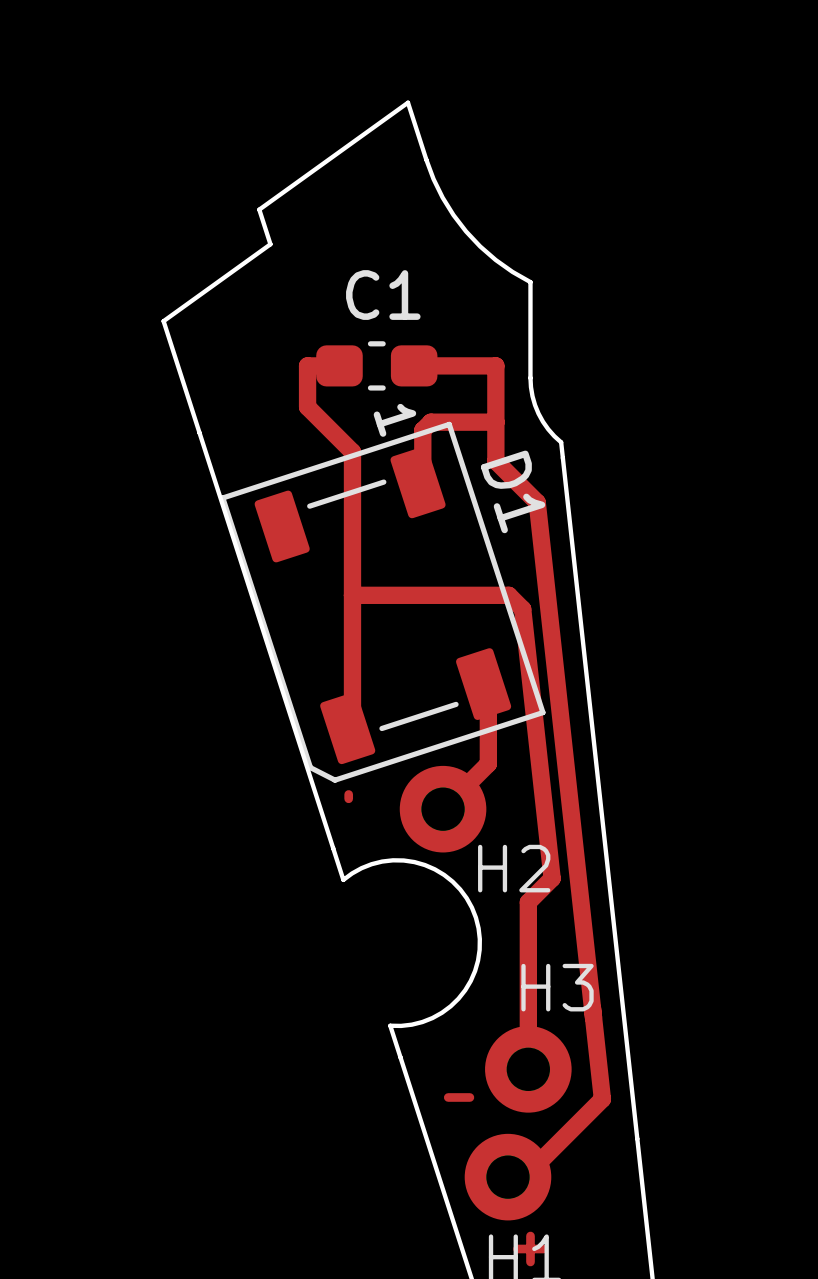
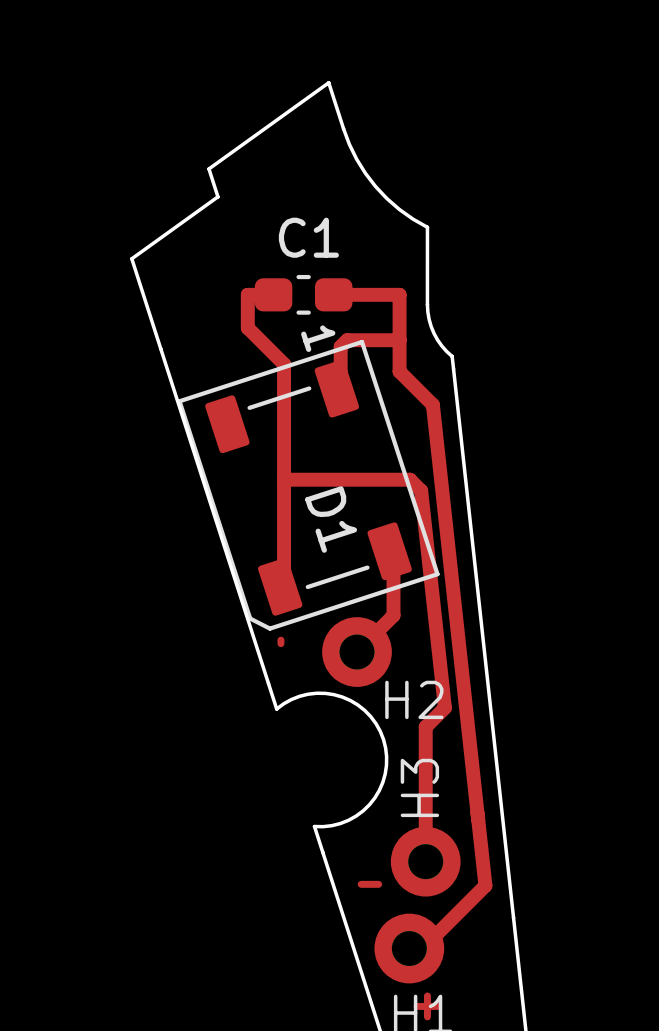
D1 name position: D1 (513, 491) -> D1 (331, 519)
H3 name rotation: 0° (557, 987) -> 90° counterclockwise (419, 787)

